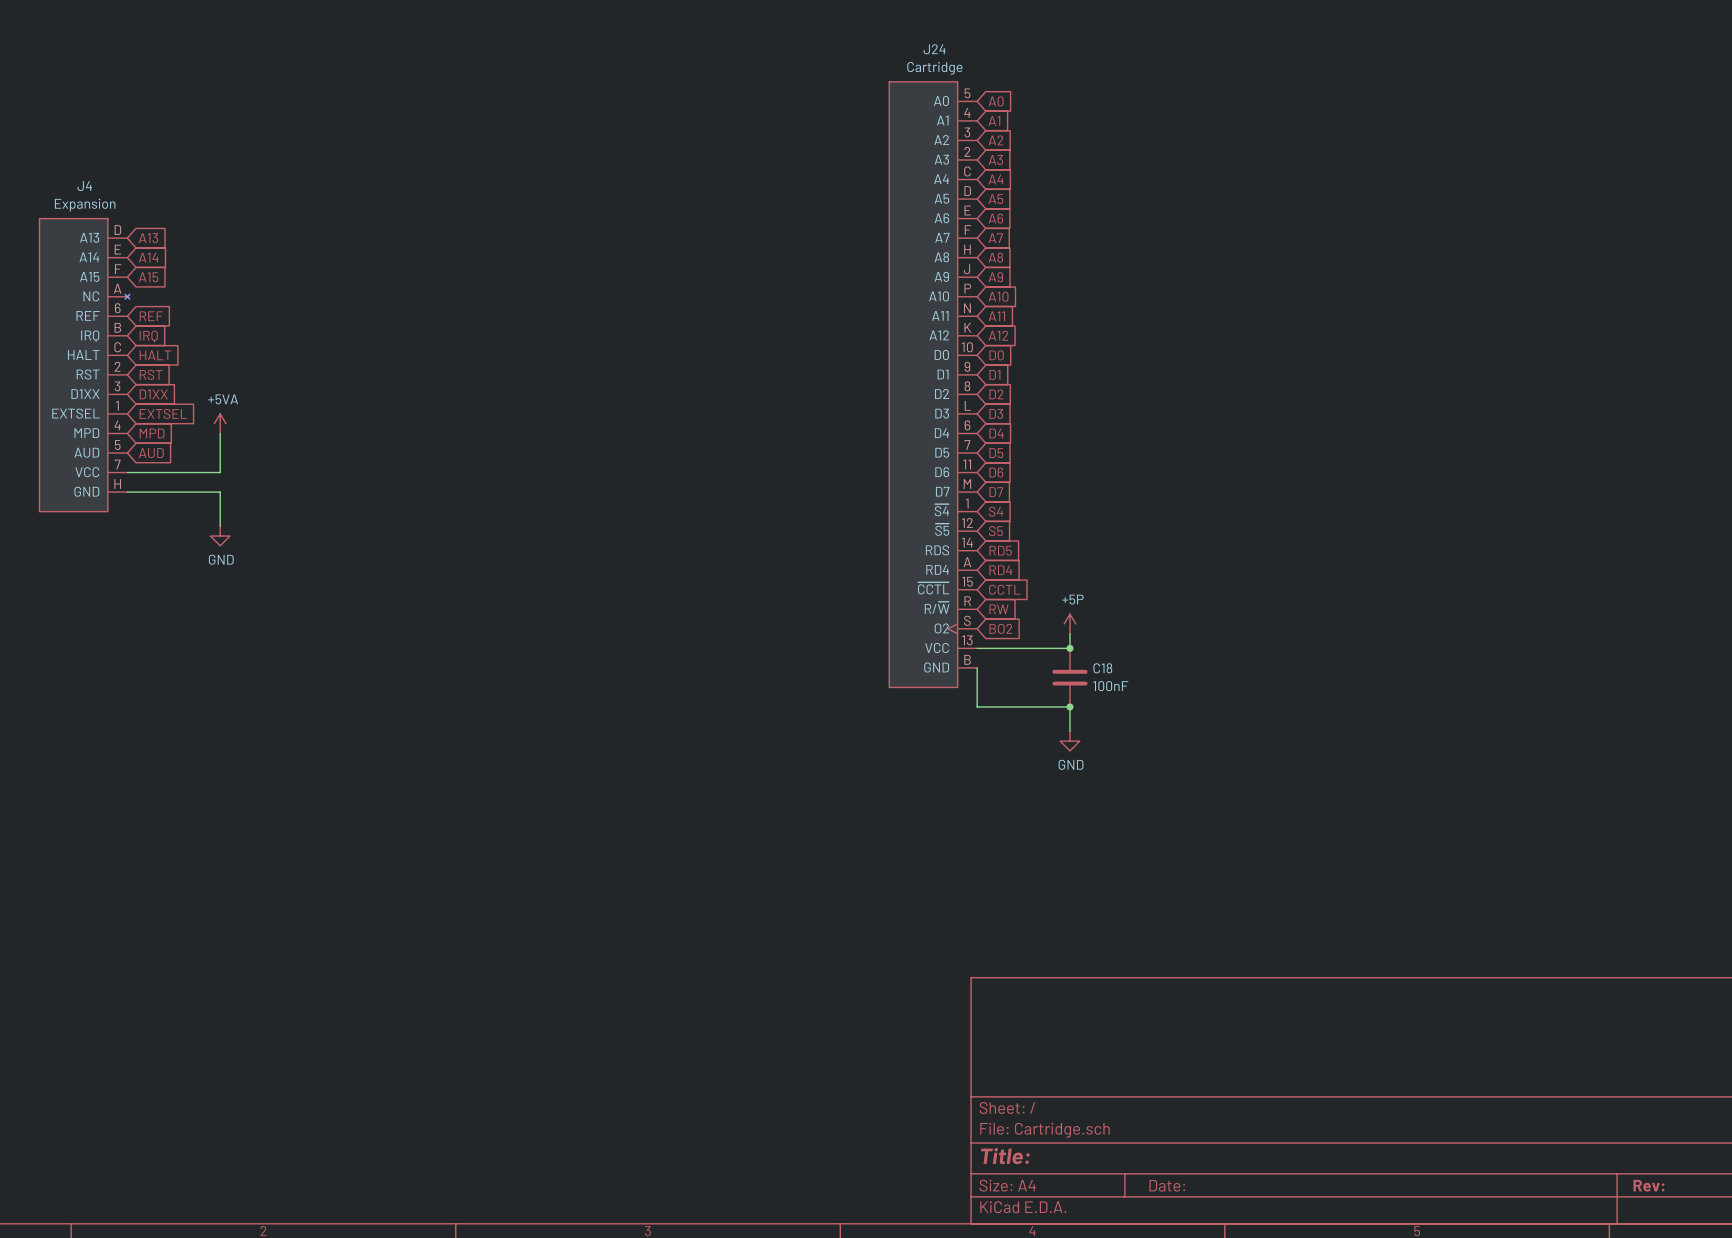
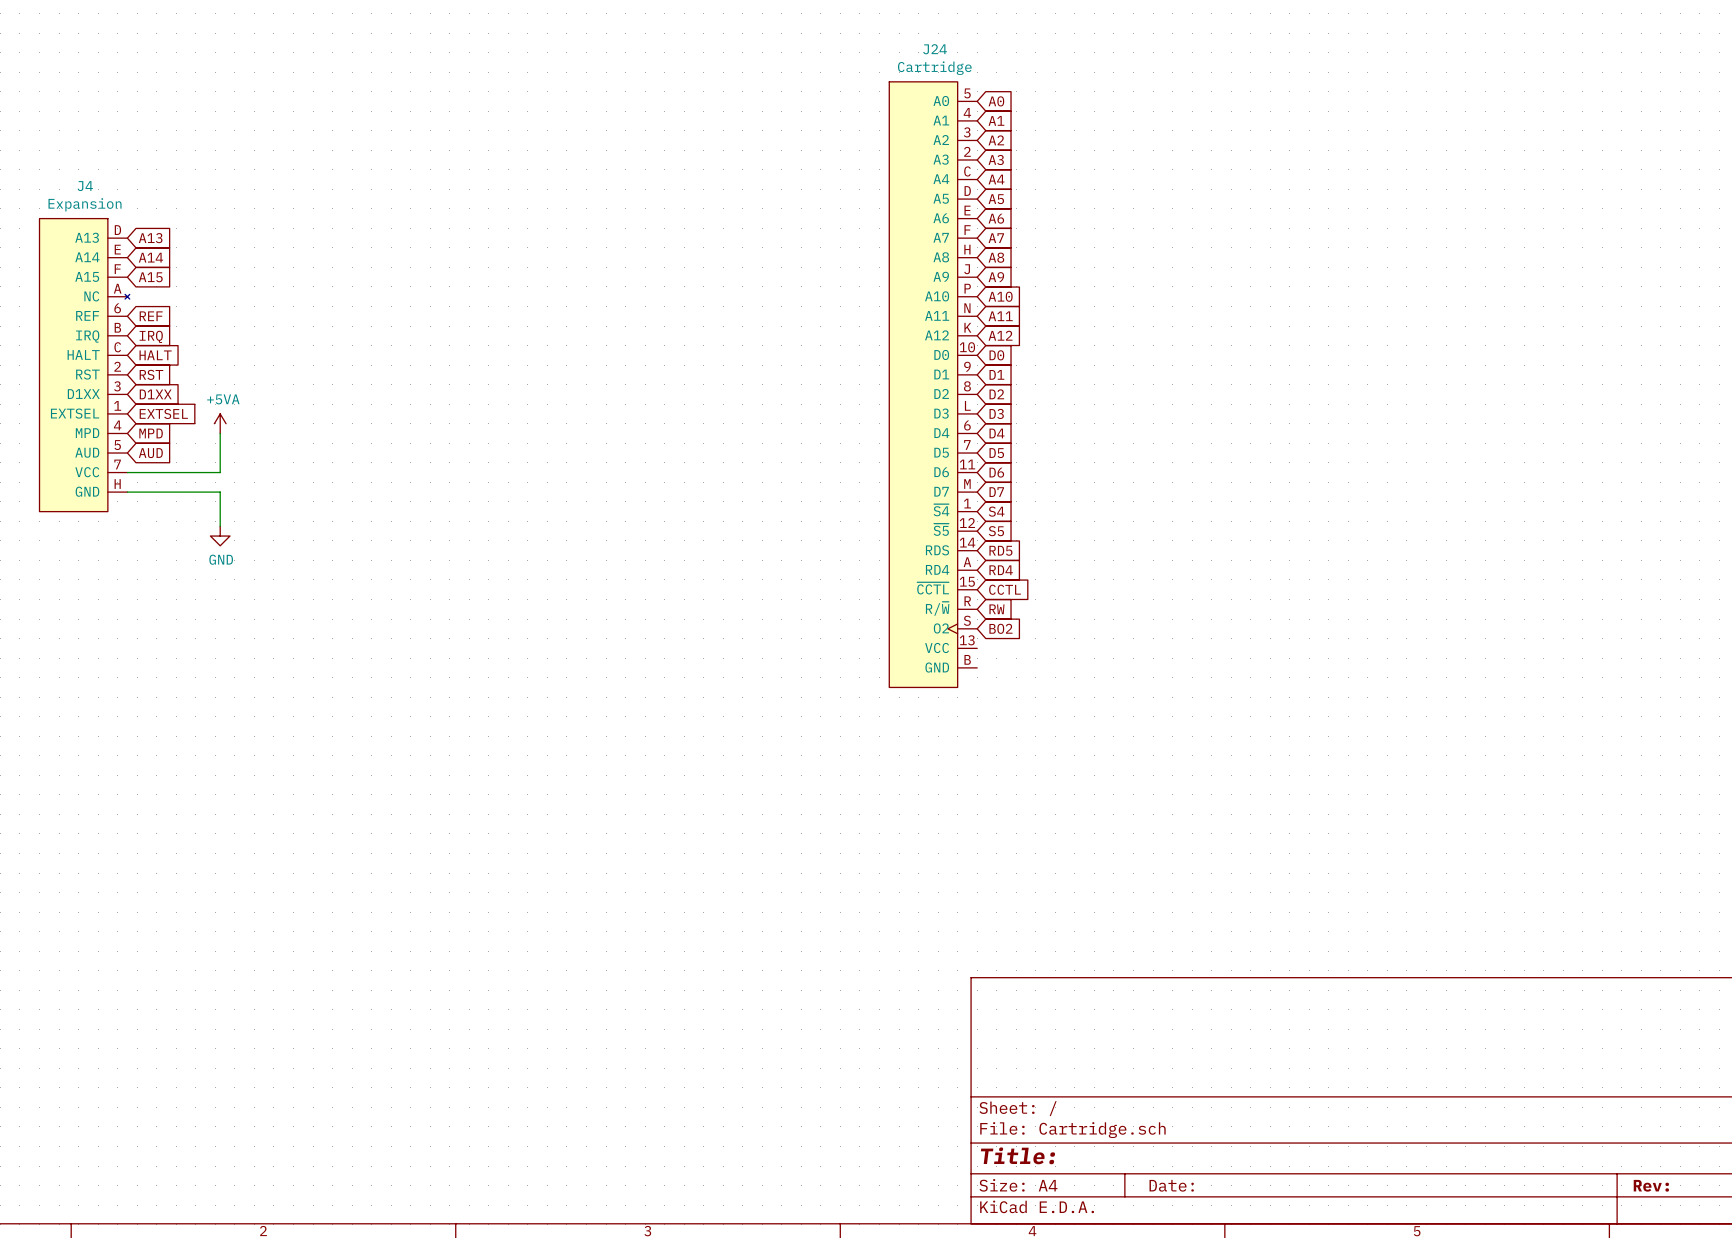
power symbol: +5P (1069, 623) -> none
wire: (1069, 633) (1069, 648) (977, 648) -> none
junction: (1069, 648) -> none
wire: (977, 667) (977, 706) (1069, 706) (1069, 731) -> none
C18: 100nF (1069, 677) -> none
junction: (1069, 706) -> none
power symbol: GND (1069, 741) -> none

